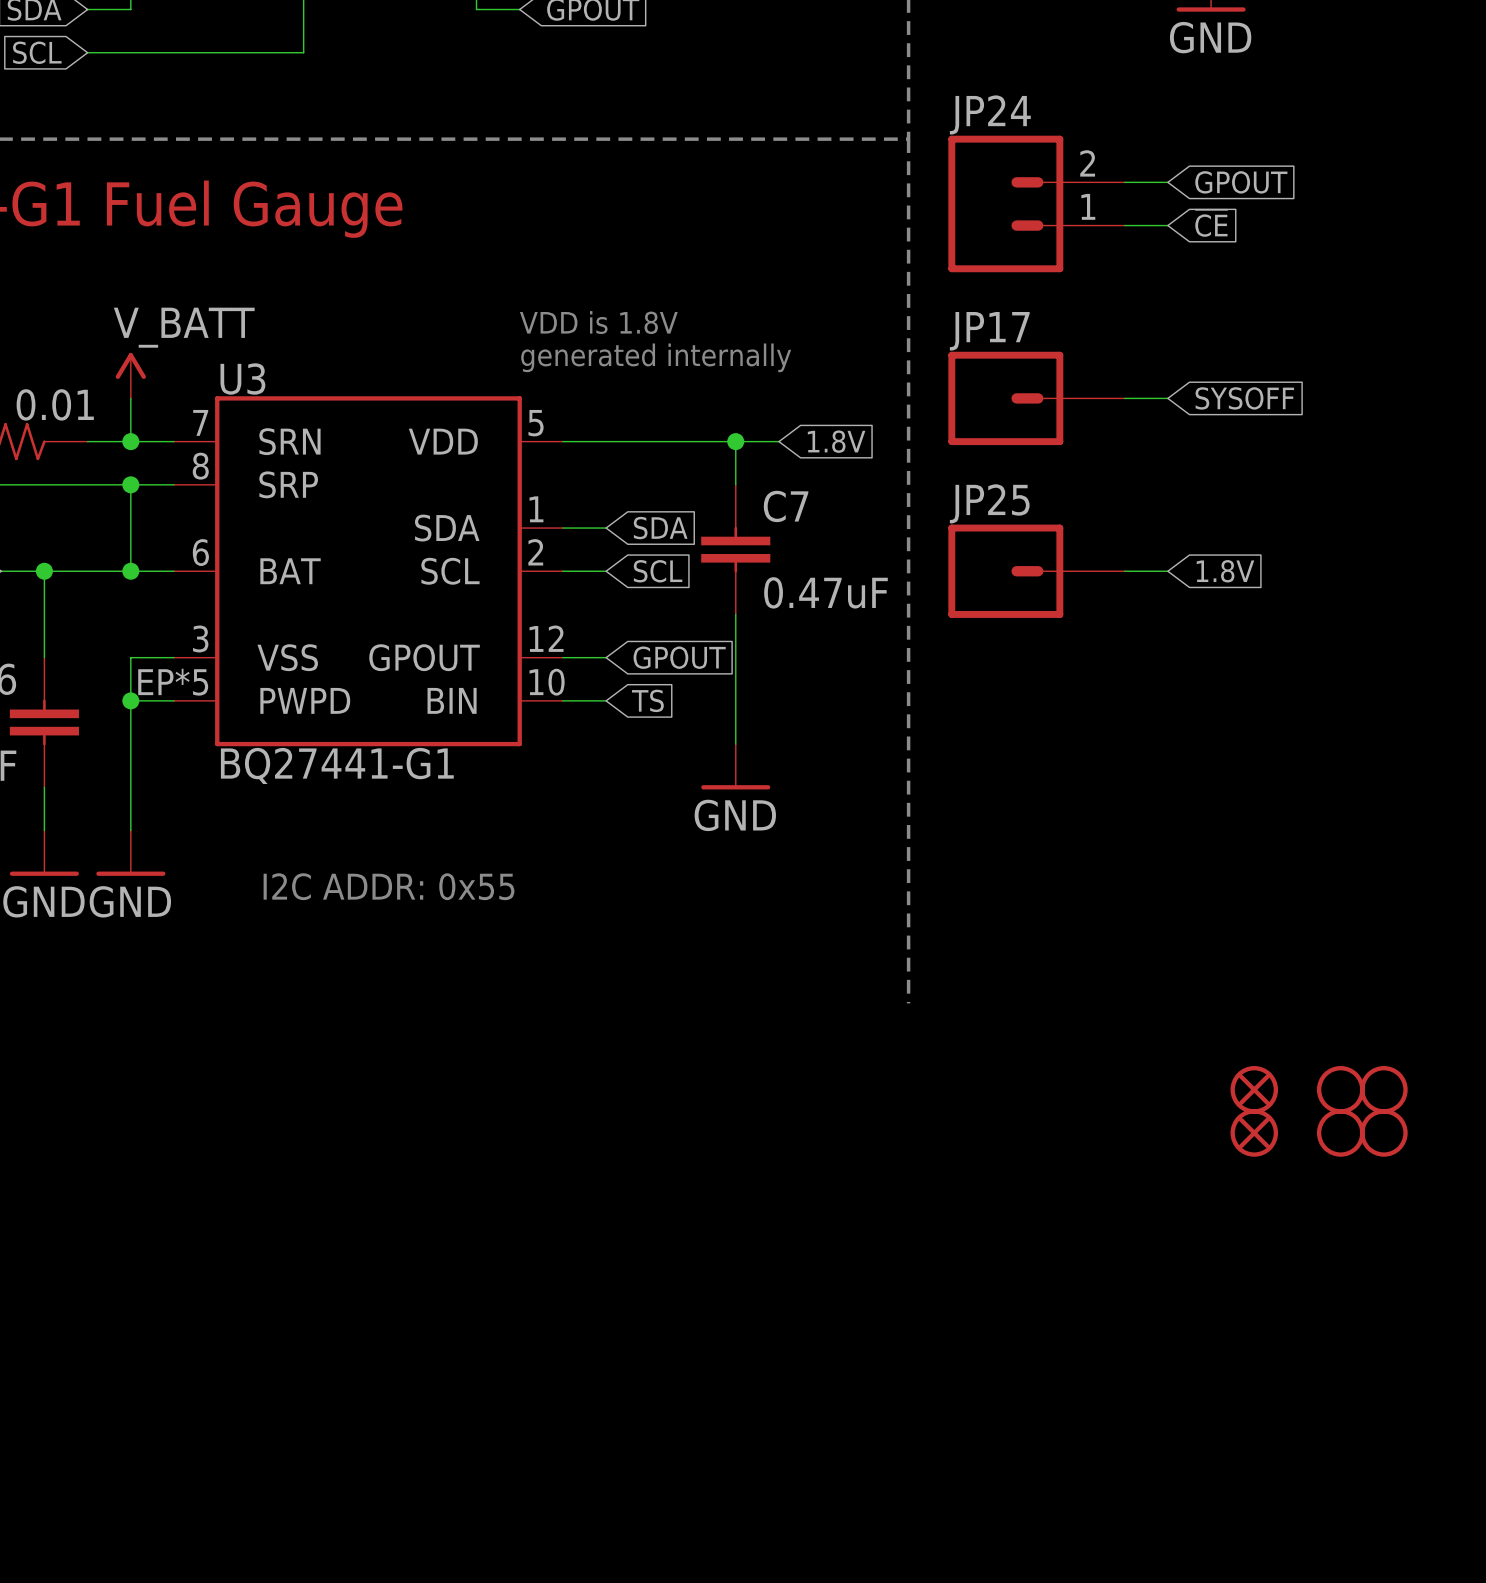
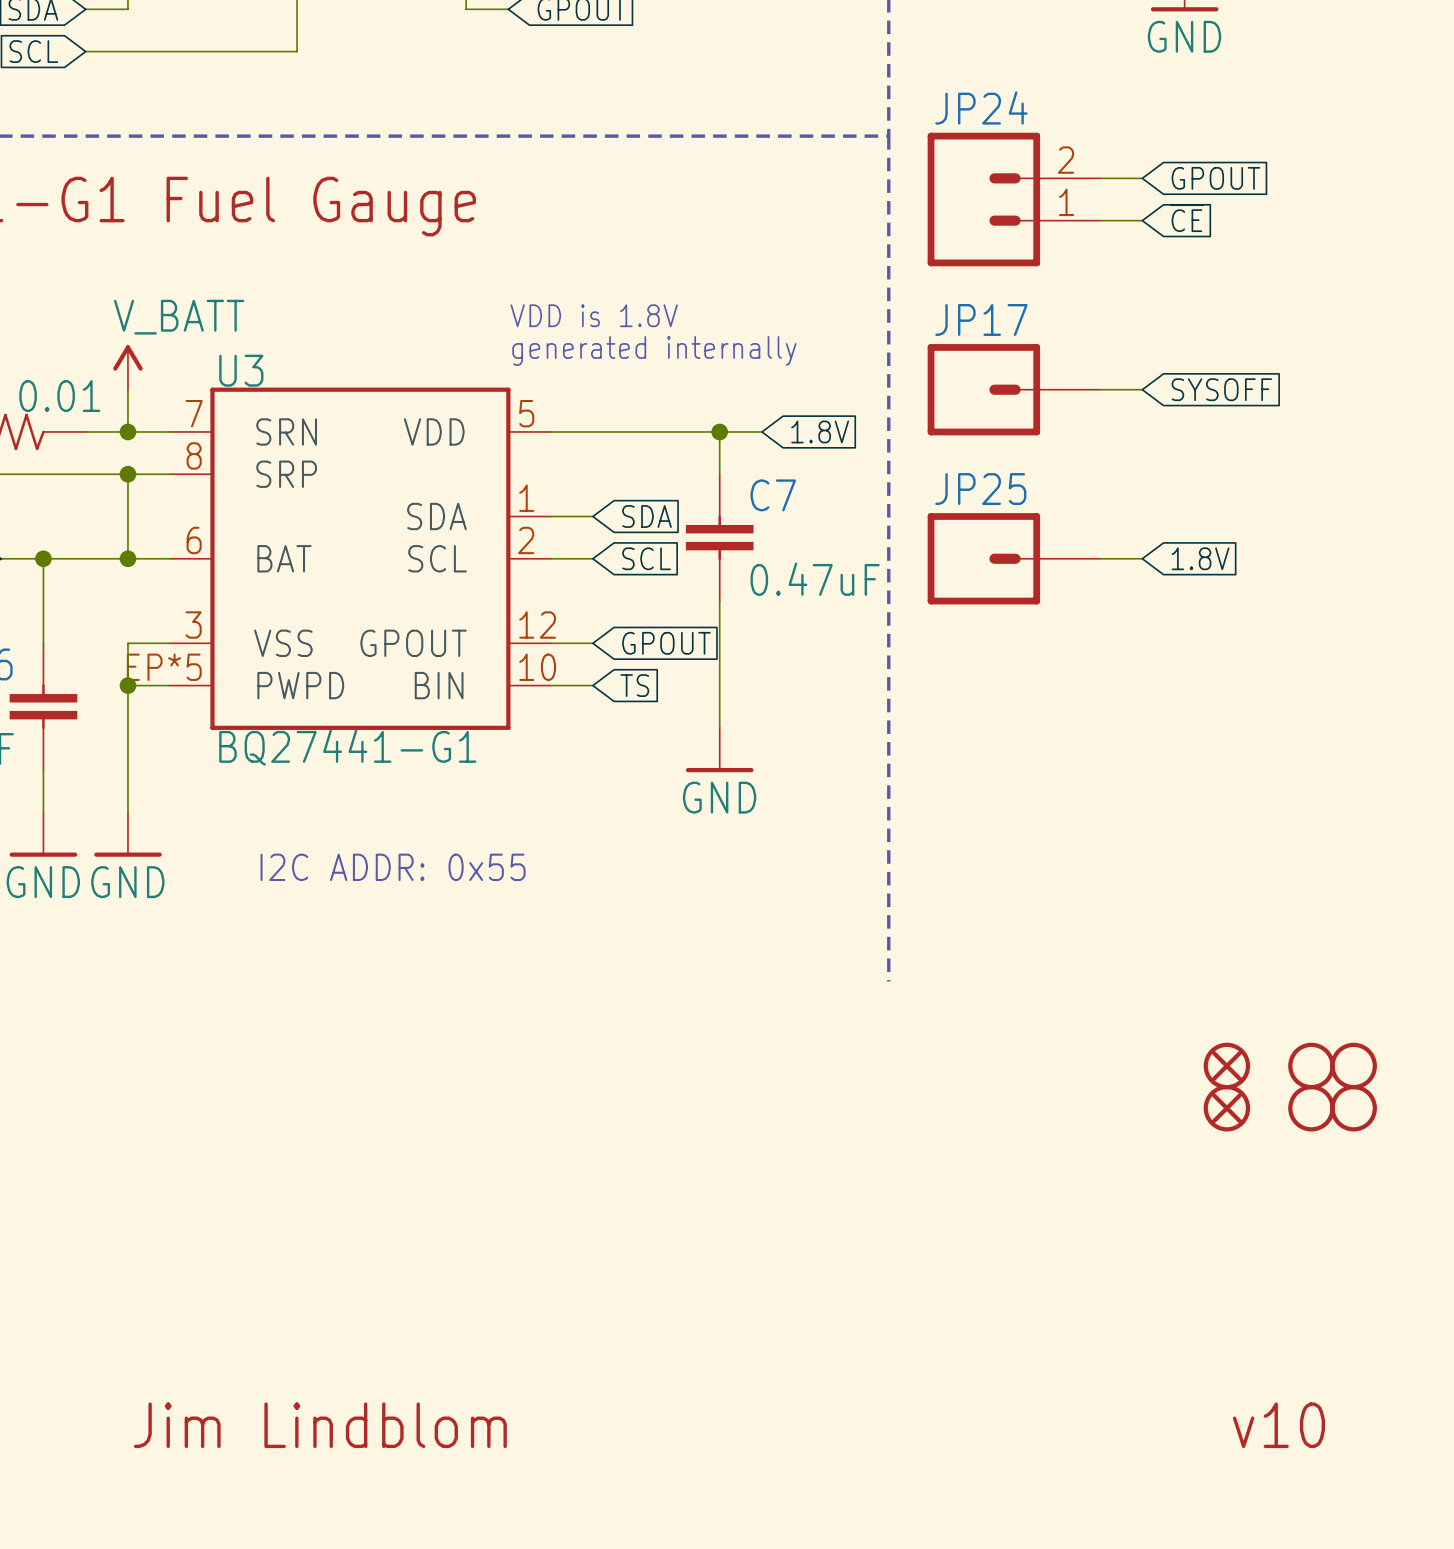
text: none -> v10 (1278, 1425)
text: none -> Jim Lindblom (320, 1425)

